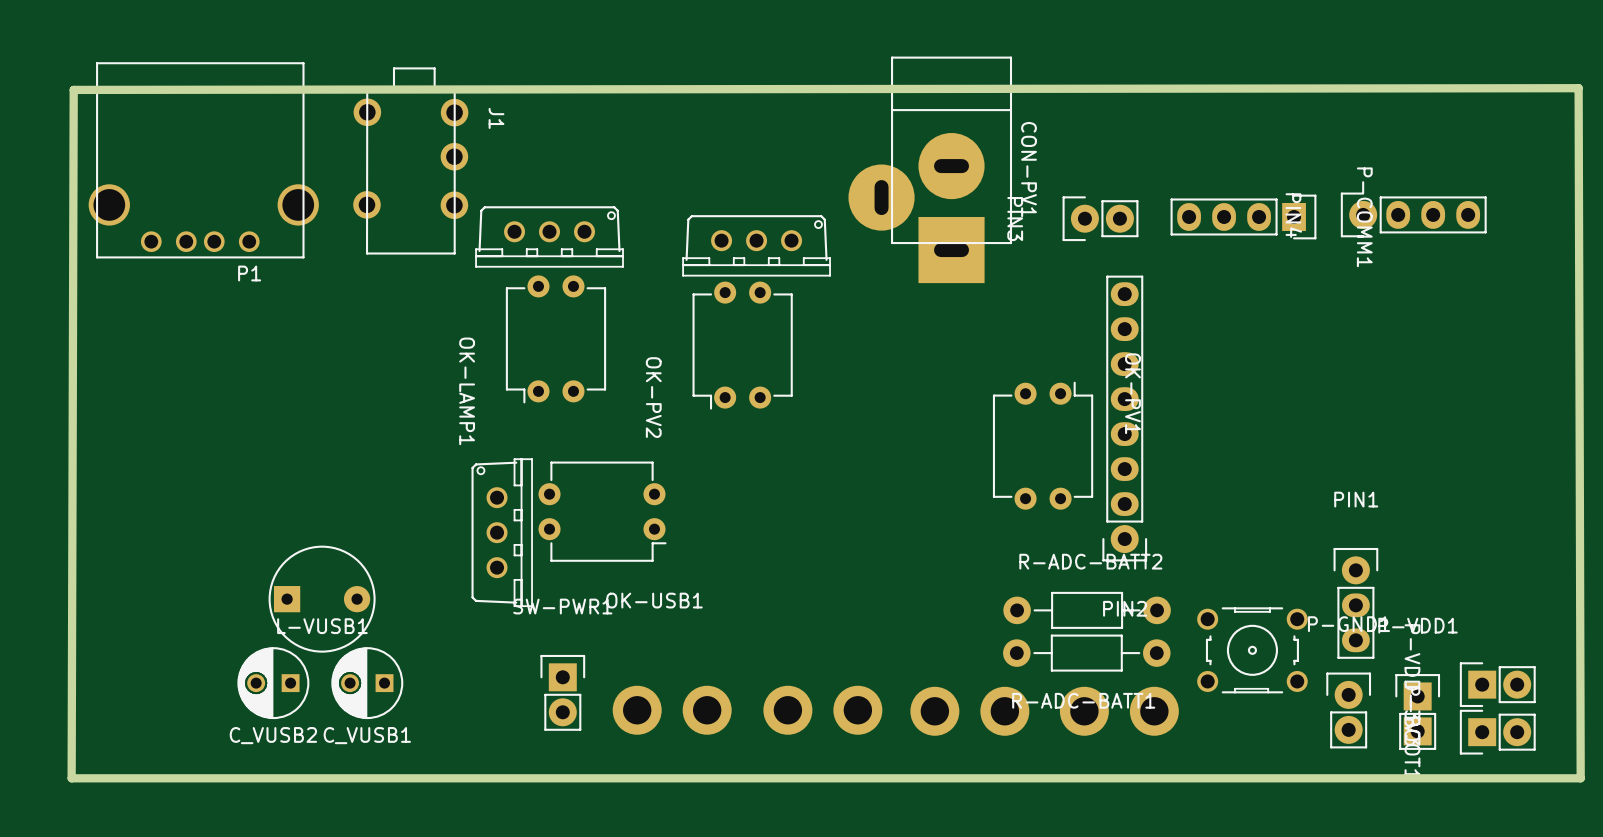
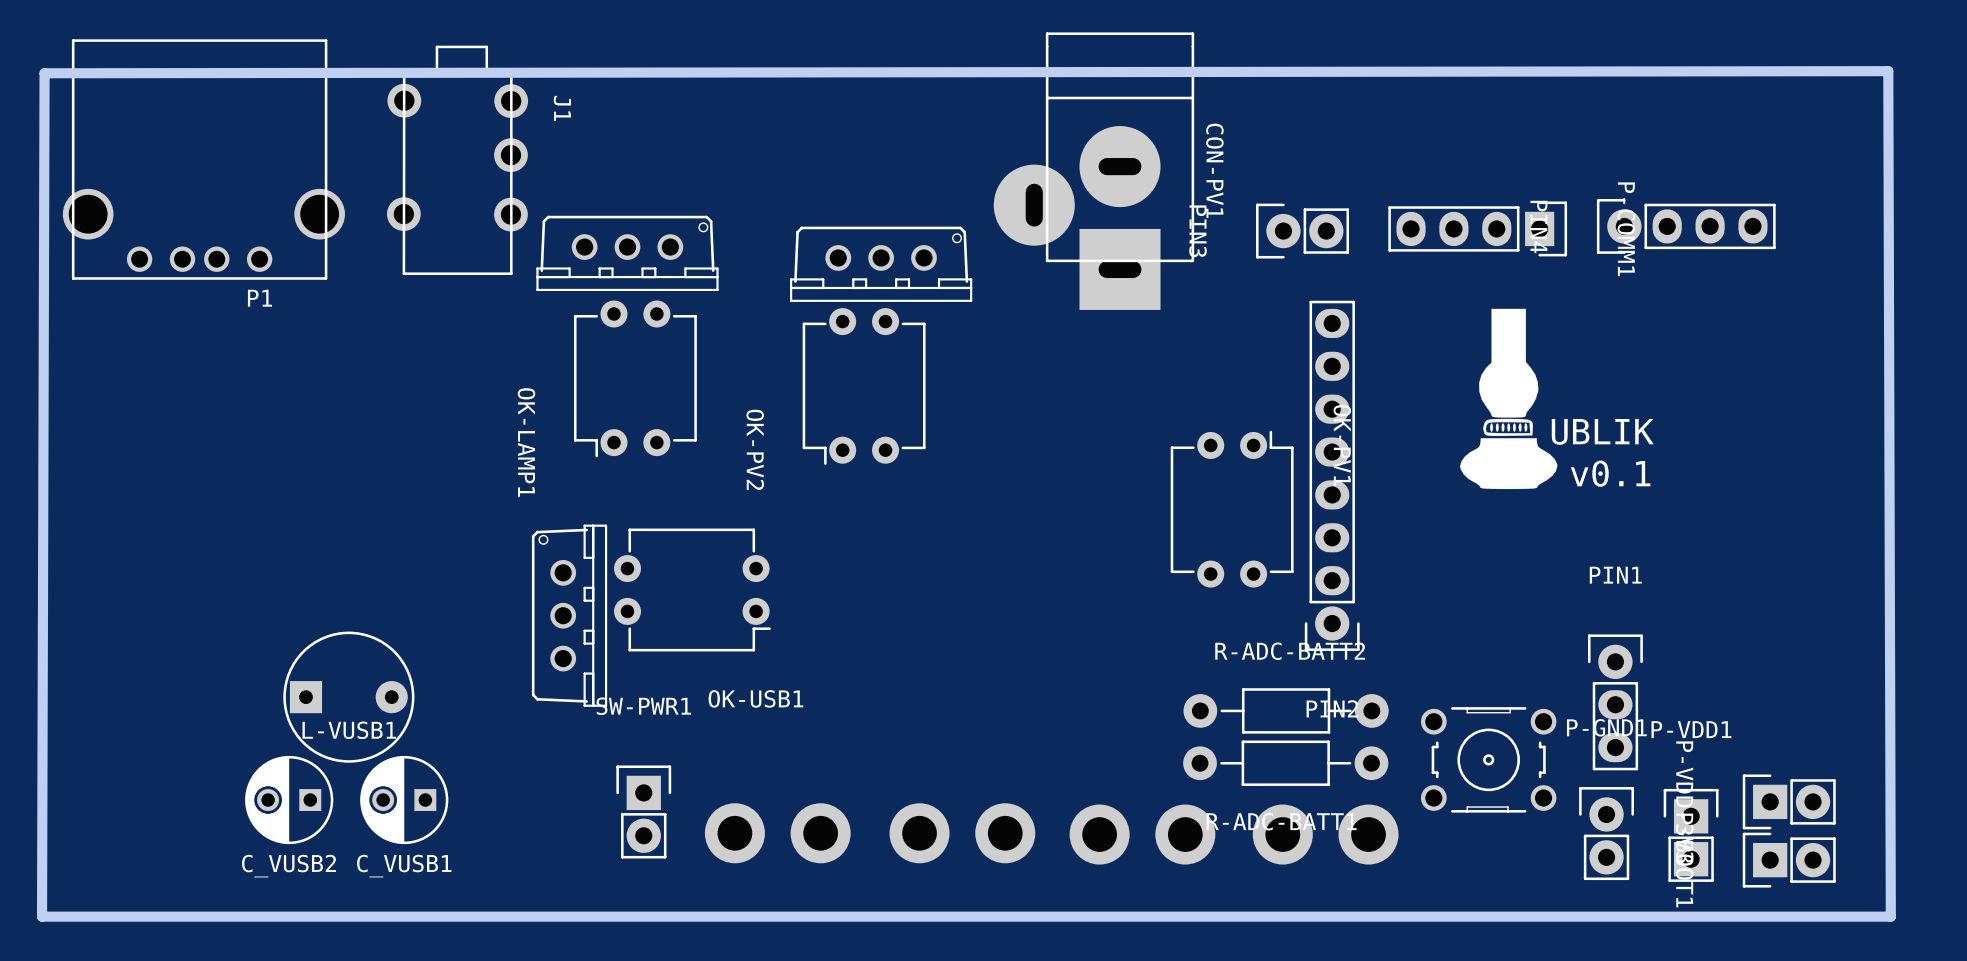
drawing: none -> [1460, 308, 1558, 490]
text: none -> UBLIK (1602, 431)
text: none -> v0.1 (1610, 473)

